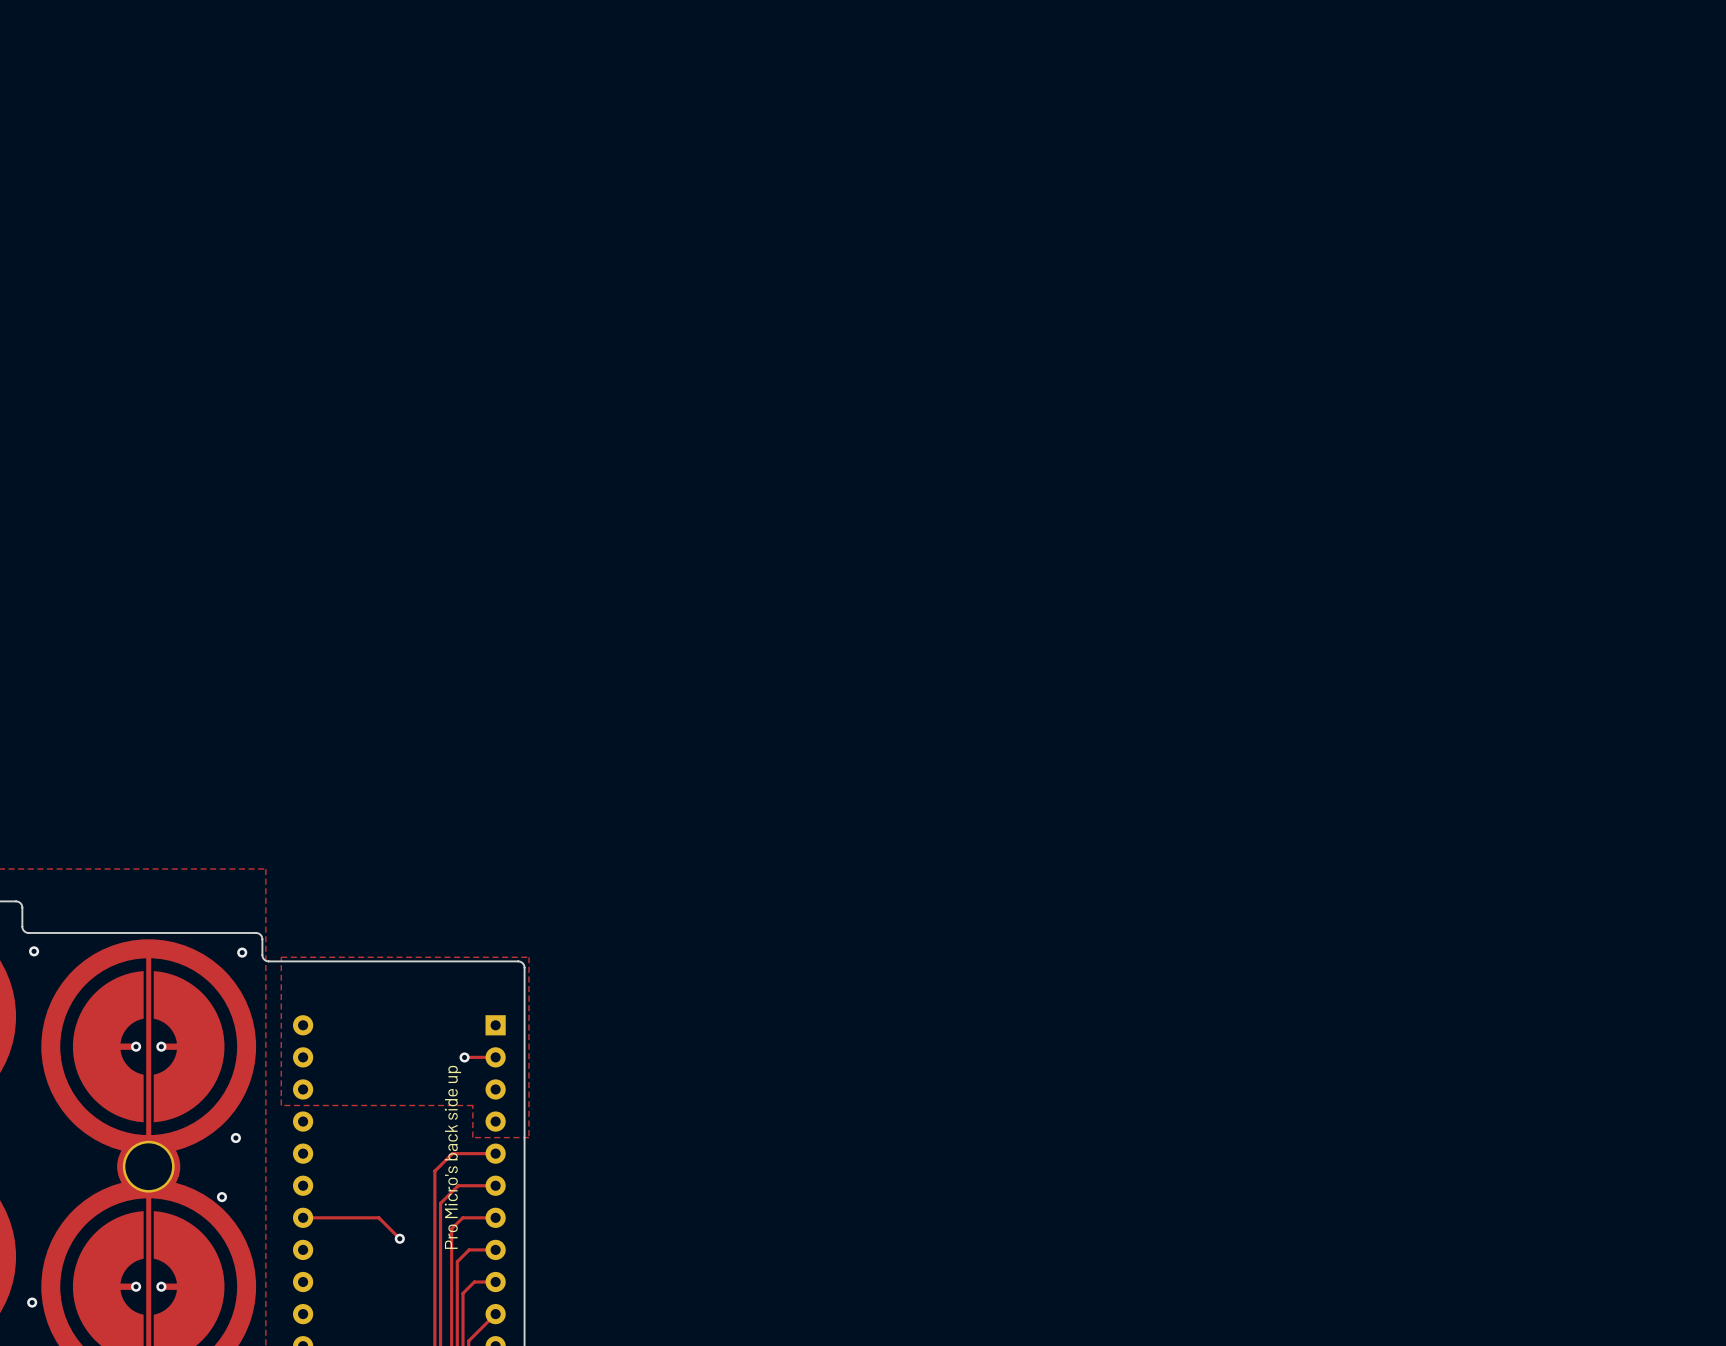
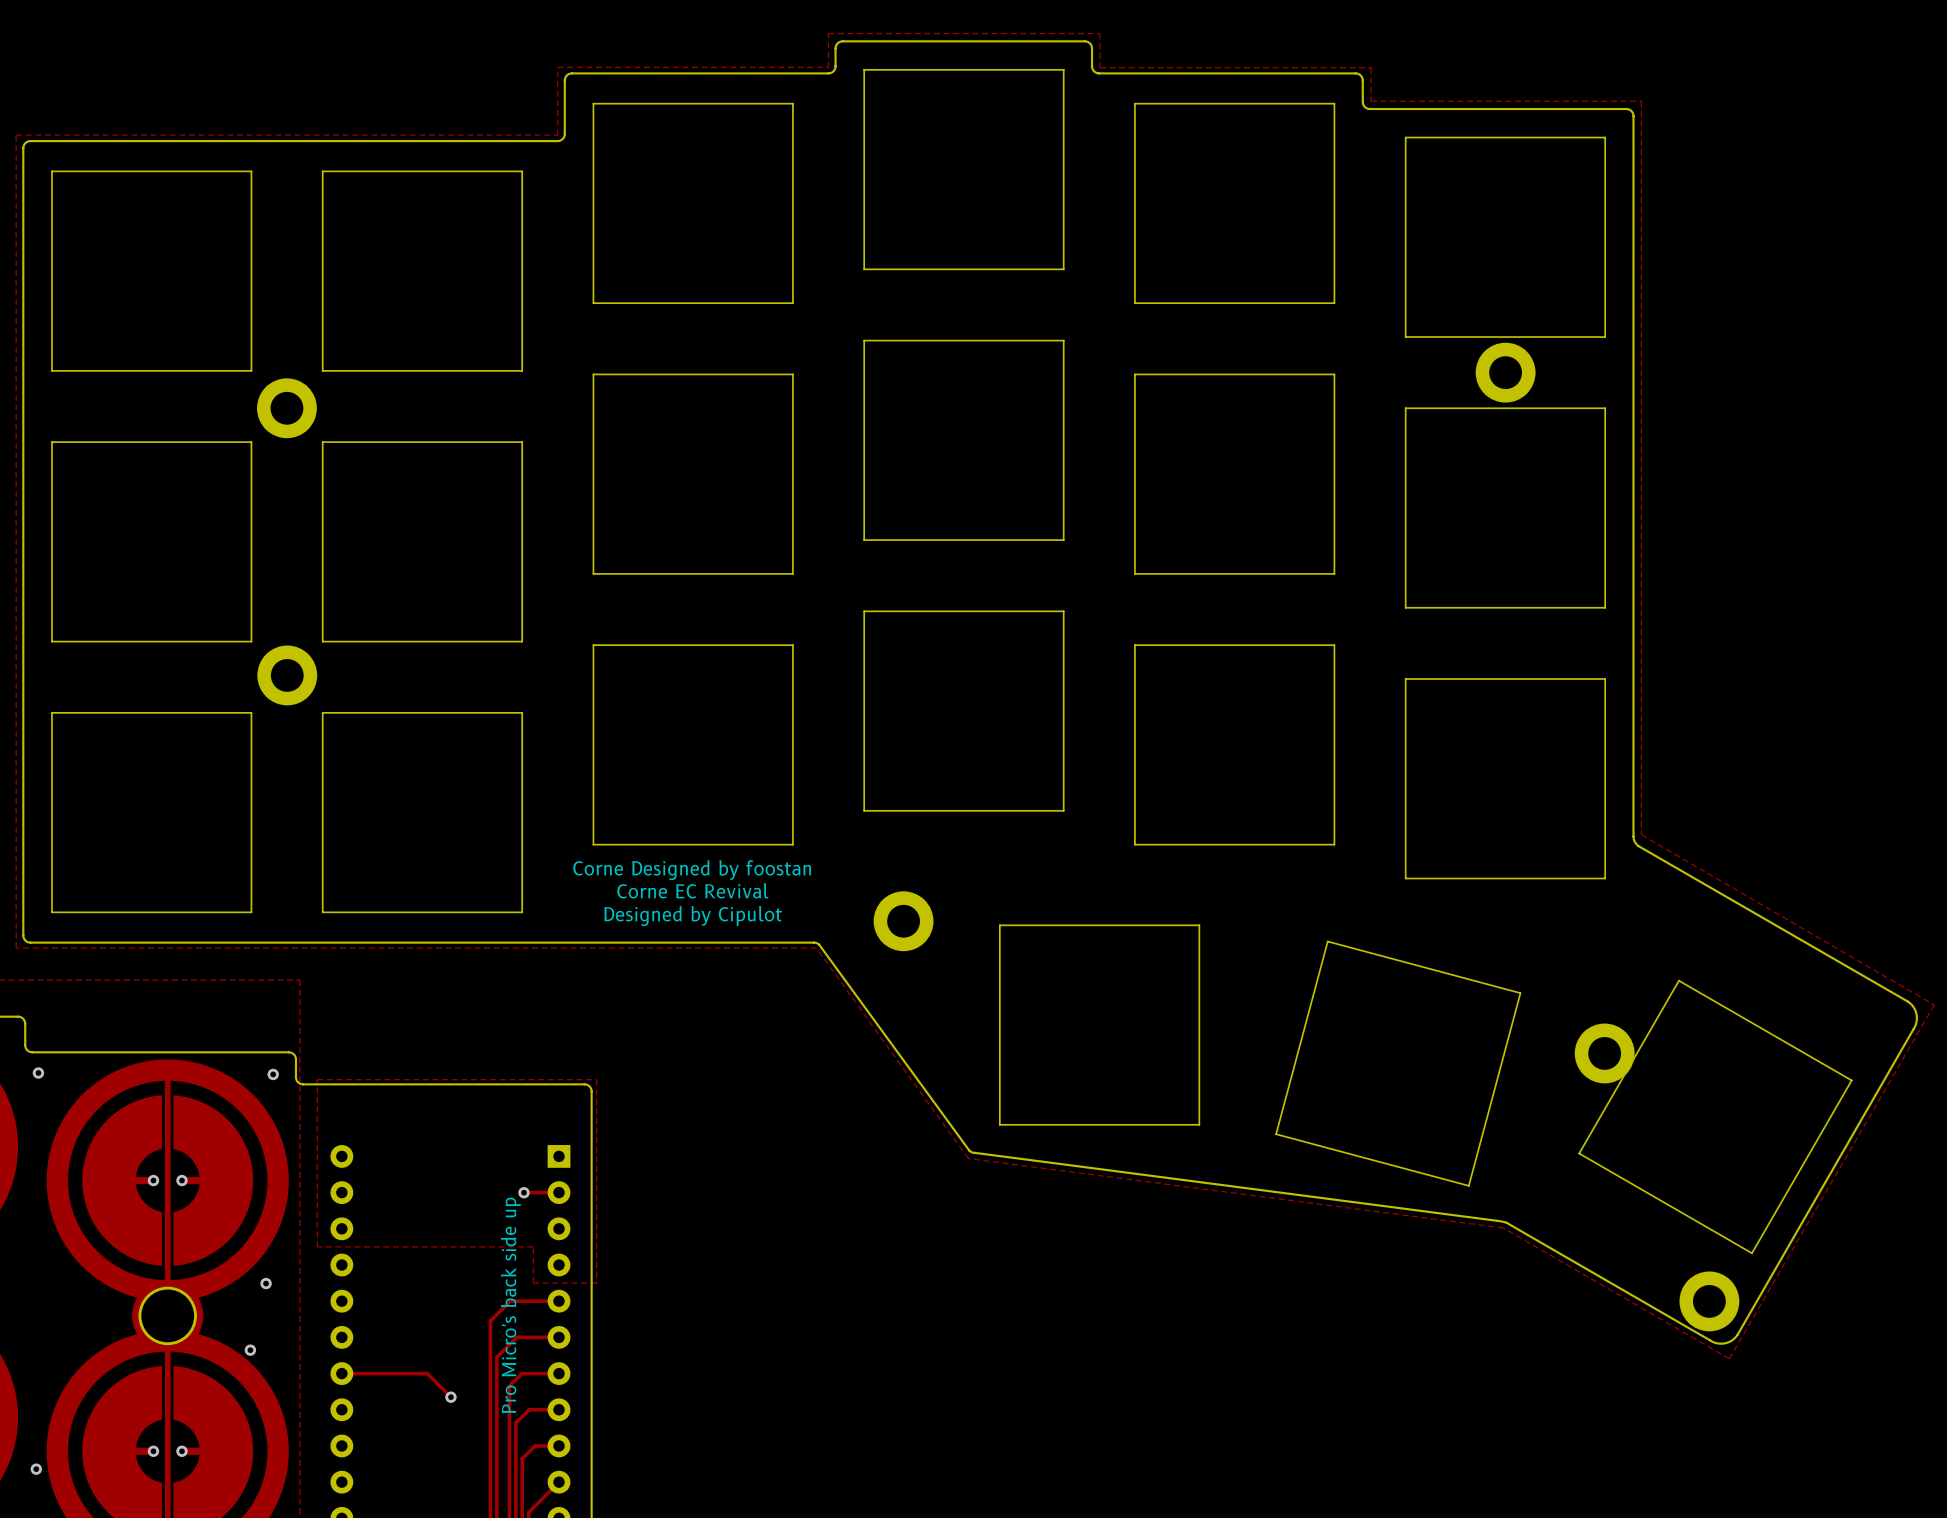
zone outline: none -> (828, 33) (828, 67) (557, 67) (557, 135) (16, 135) (16, 948) (816, 948) (968, 1158) (1503, 1228) (1729, 1358) (1934, 1005) (1641, 834) (1641, 101) (1370, 101) (1370, 67) (1099, 67) (1099, 33) (828, 33)
board edge: none -> (842, 41) (1085, 41) (1091, 45) (1092, 68) (1098, 73) (1357, 73) (1362, 79) (1363, 103) (1368, 108) (1626, 109) (1632, 111) (1633, 839) (1638, 846) (1908, 1001) (1914, 1008) (1916, 1016) (1914, 1027) (1737, 1334) (1732, 1339) (1722, 1343) (1711, 1341) (1501, 1221) (971, 1152) (819, 944) (815, 942) (30, 942) (24, 939) (23, 148) (25, 143) (30, 141) (558, 141) (564, 134) (564, 79) (569, 73) (829, 73) (835, 68) (836, 45) (842, 41)
drawing: none -> [863, 68, 1065, 271]
drawing: none -> [592, 102, 794, 305]
drawing: none -> [1134, 102, 1336, 305]
drawing: none -> [1404, 136, 1607, 338]
drawing: none -> [51, 170, 253, 372]
drawing: none -> [321, 170, 524, 372]
drawing: none -> [863, 339, 1065, 541]
part: none -> (1505, 372)
drawing: none -> [592, 373, 794, 575]
drawing: none -> [1134, 373, 1336, 575]
part: none -> (286, 408)
drawing: none -> [1404, 407, 1607, 609]
drawing: none -> [51, 441, 253, 643]
drawing: none -> [321, 441, 524, 643]
drawing: none -> [863, 610, 1065, 812]
drawing: none -> [592, 644, 794, 846]
drawing: none -> [1134, 644, 1336, 846]
part: none -> (287, 675)
drawing: none -> [1404, 678, 1607, 880]
drawing: none -> [51, 712, 253, 914]
drawing: none -> [321, 712, 524, 914]
text: none -> Corne Designed by foostan (692, 870)
text: none -> Corne EC Revival (692, 890)
text: none -> Designed by Cipulot (693, 916)
part: none -> (903, 921)
drawing: none -> [998, 924, 1201, 1126]
drawing: none -> [1275, 940, 1522, 1187]
drawing: none -> [1578, 979, 1853, 1255]
part: none -> (1604, 1053)
part: none -> (1709, 1301)

